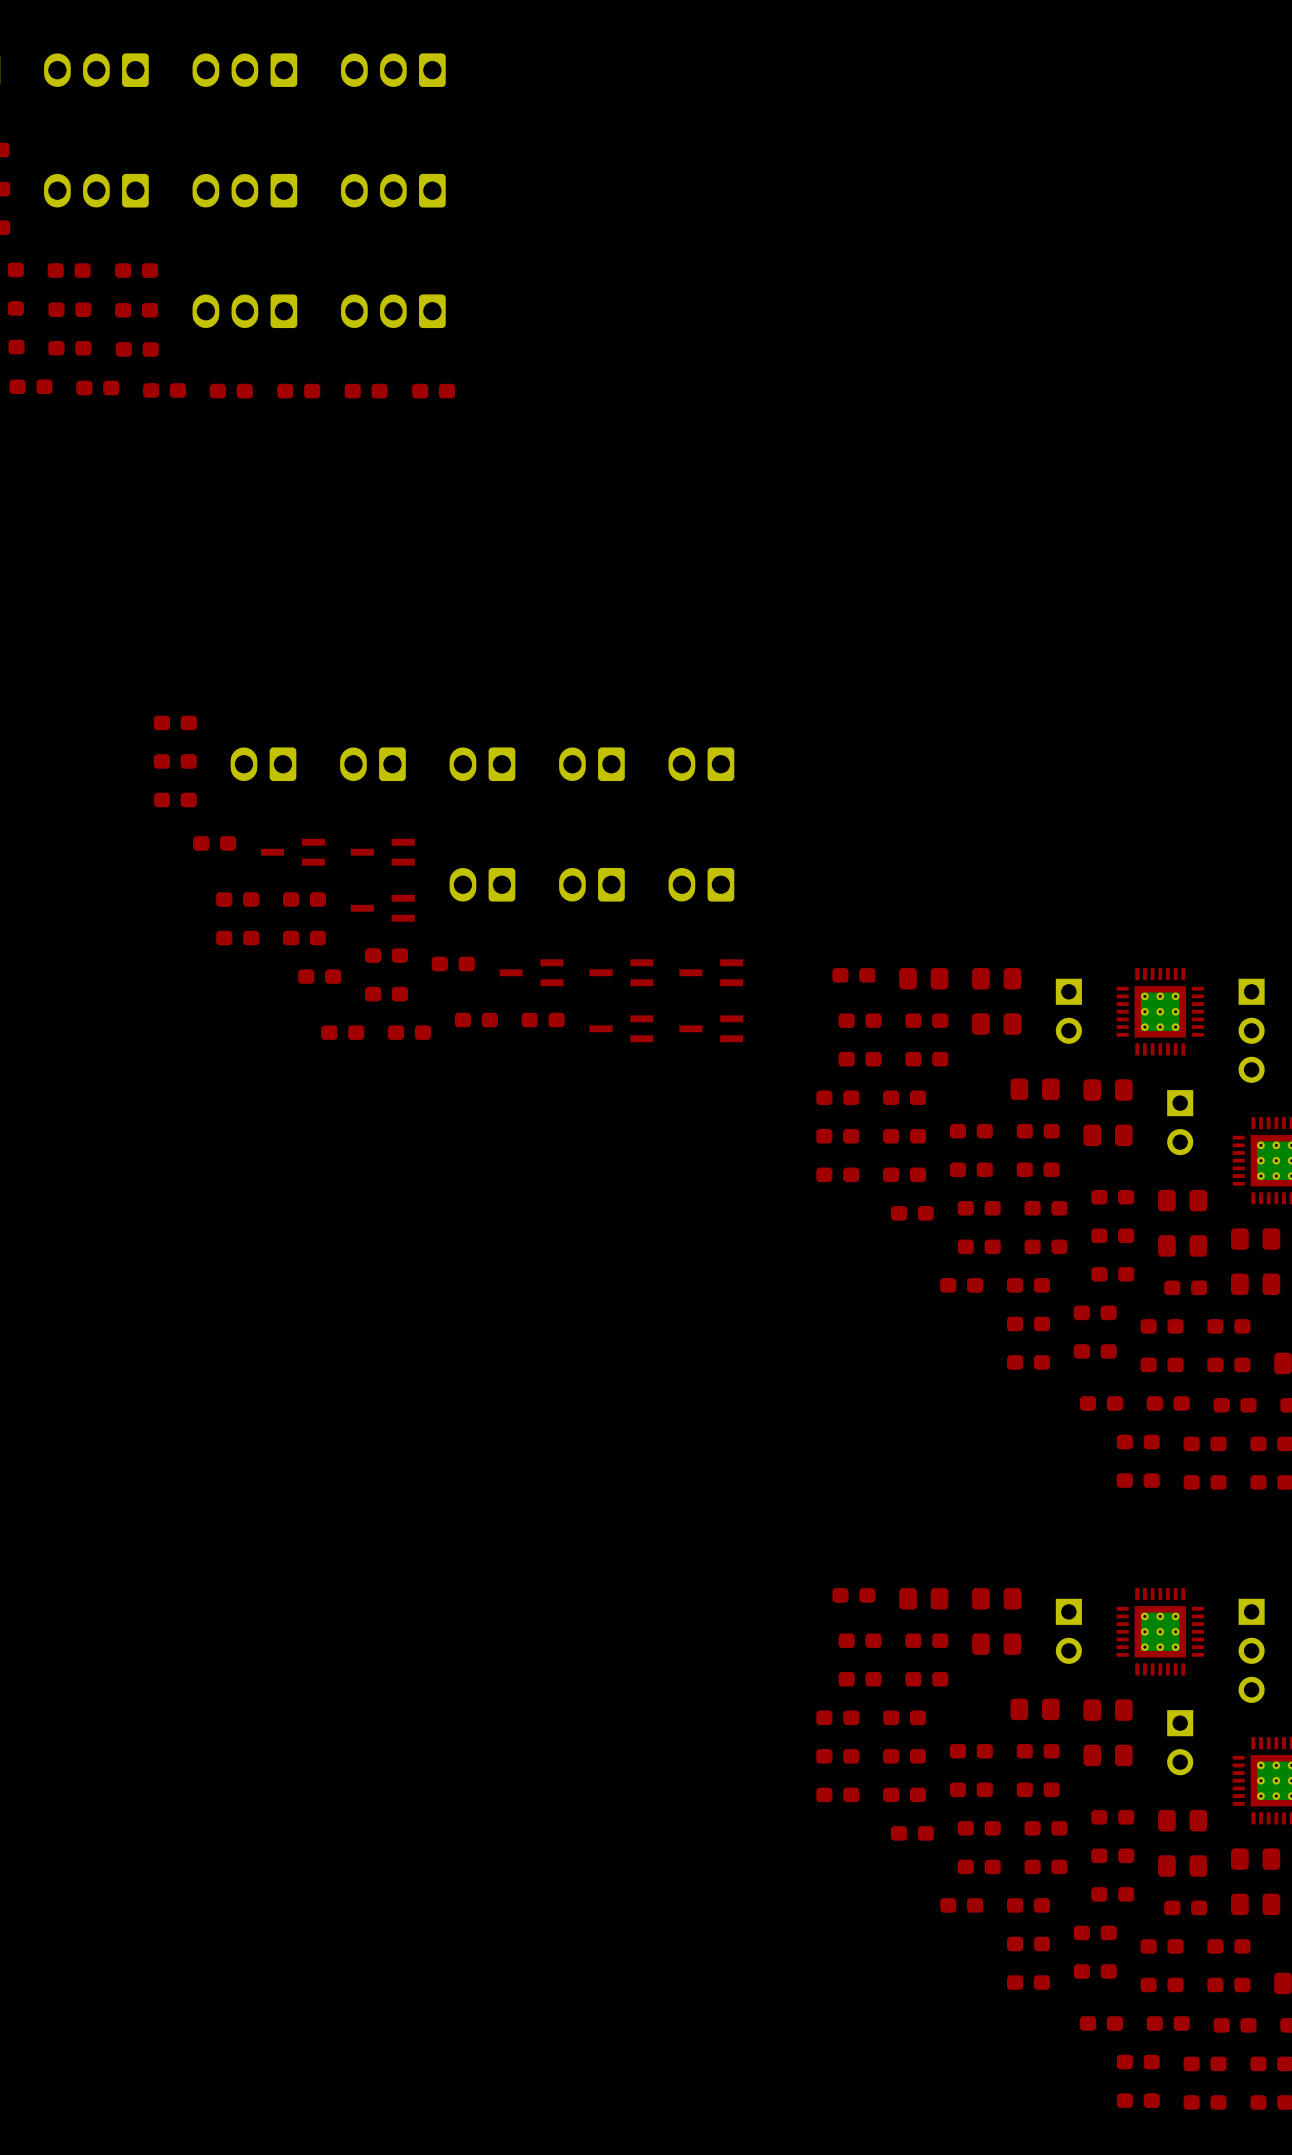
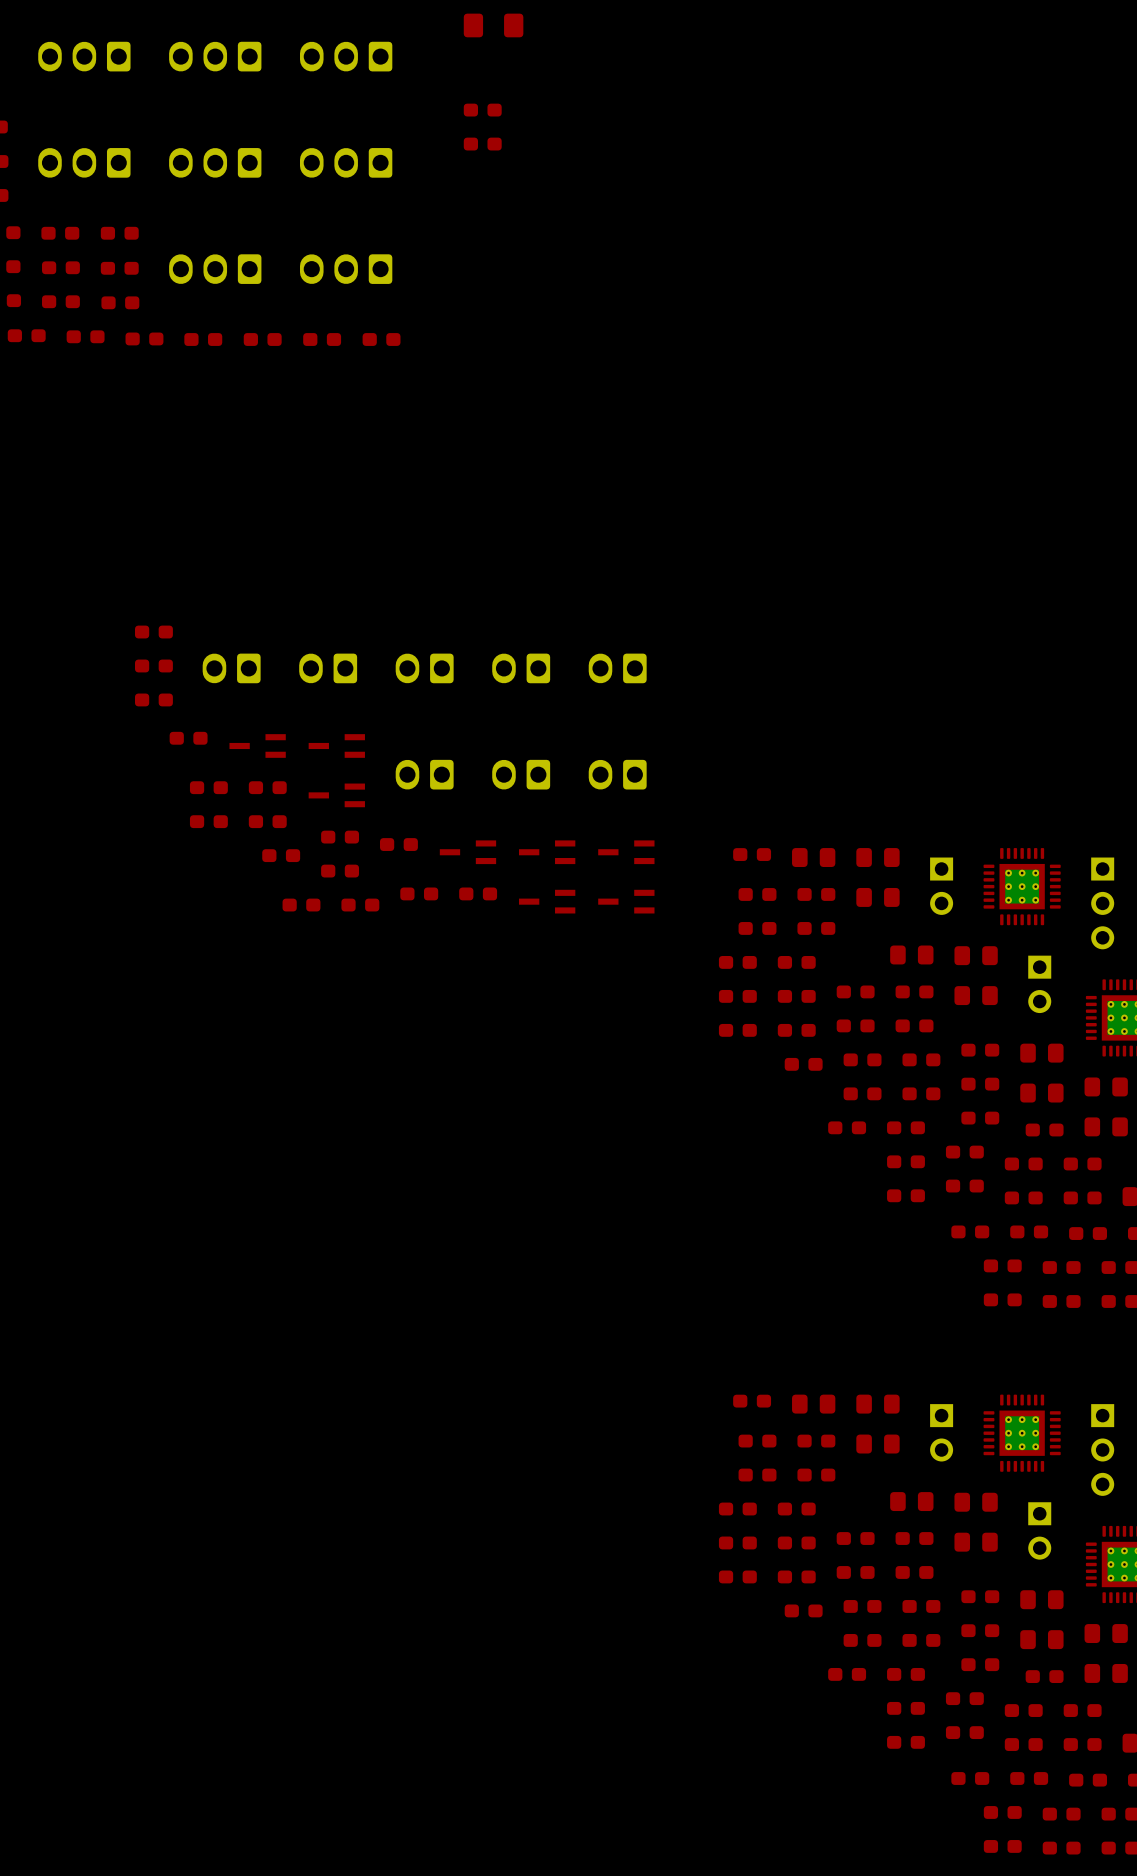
part: none -> (493, 25)
part: none -> (482, 110)
part: none -> (482, 144)

